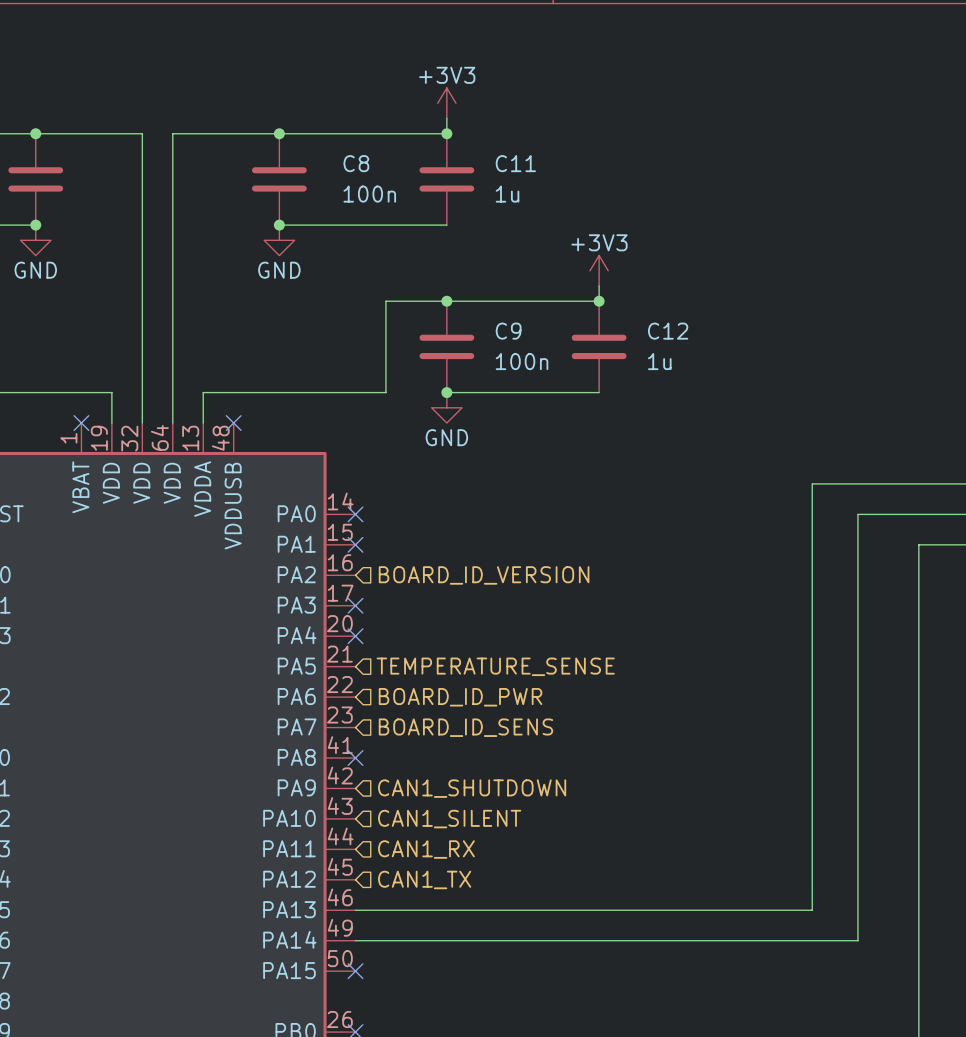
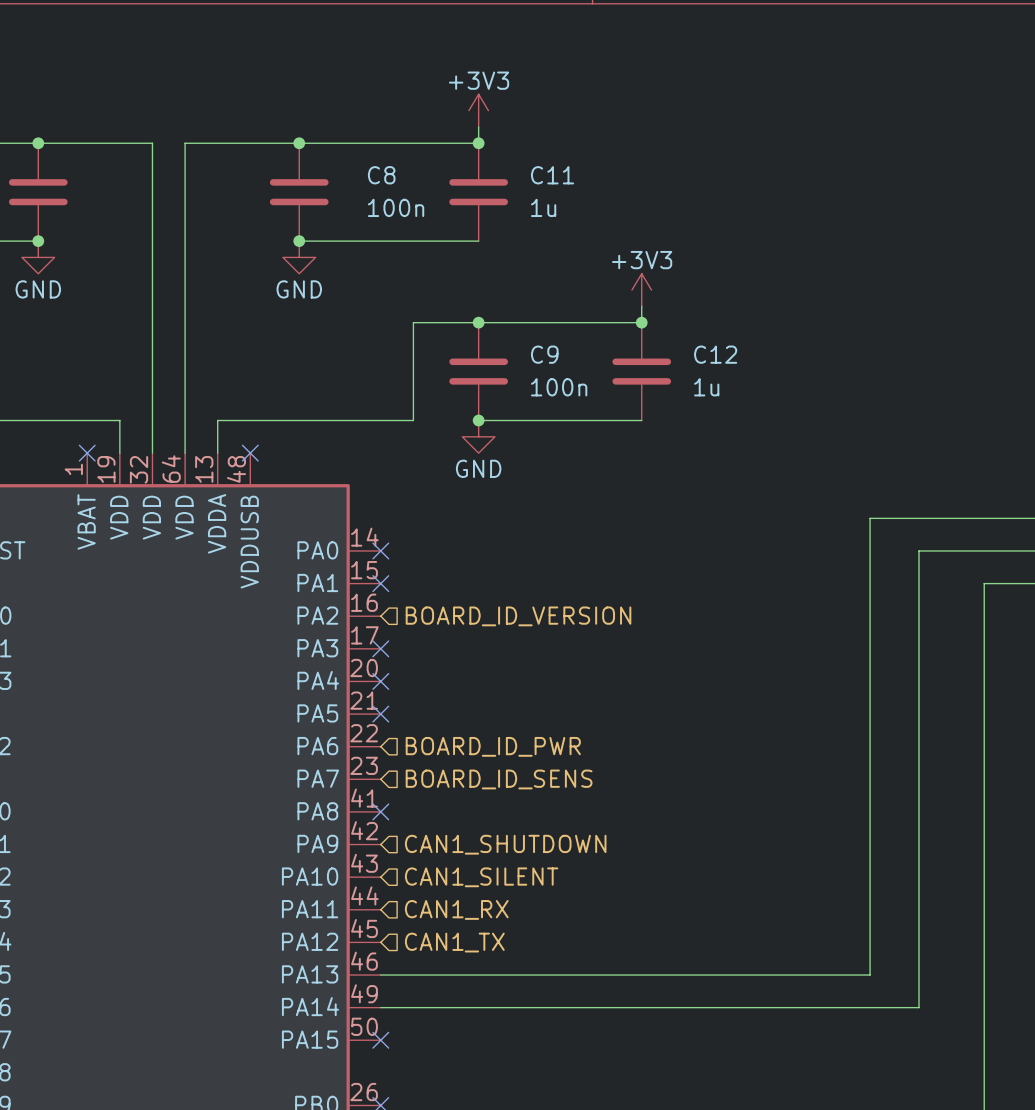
no-connect mark: none -> (380, 714)
hierarchical label: TEMPERATURE_SENSE (495, 666) -> none

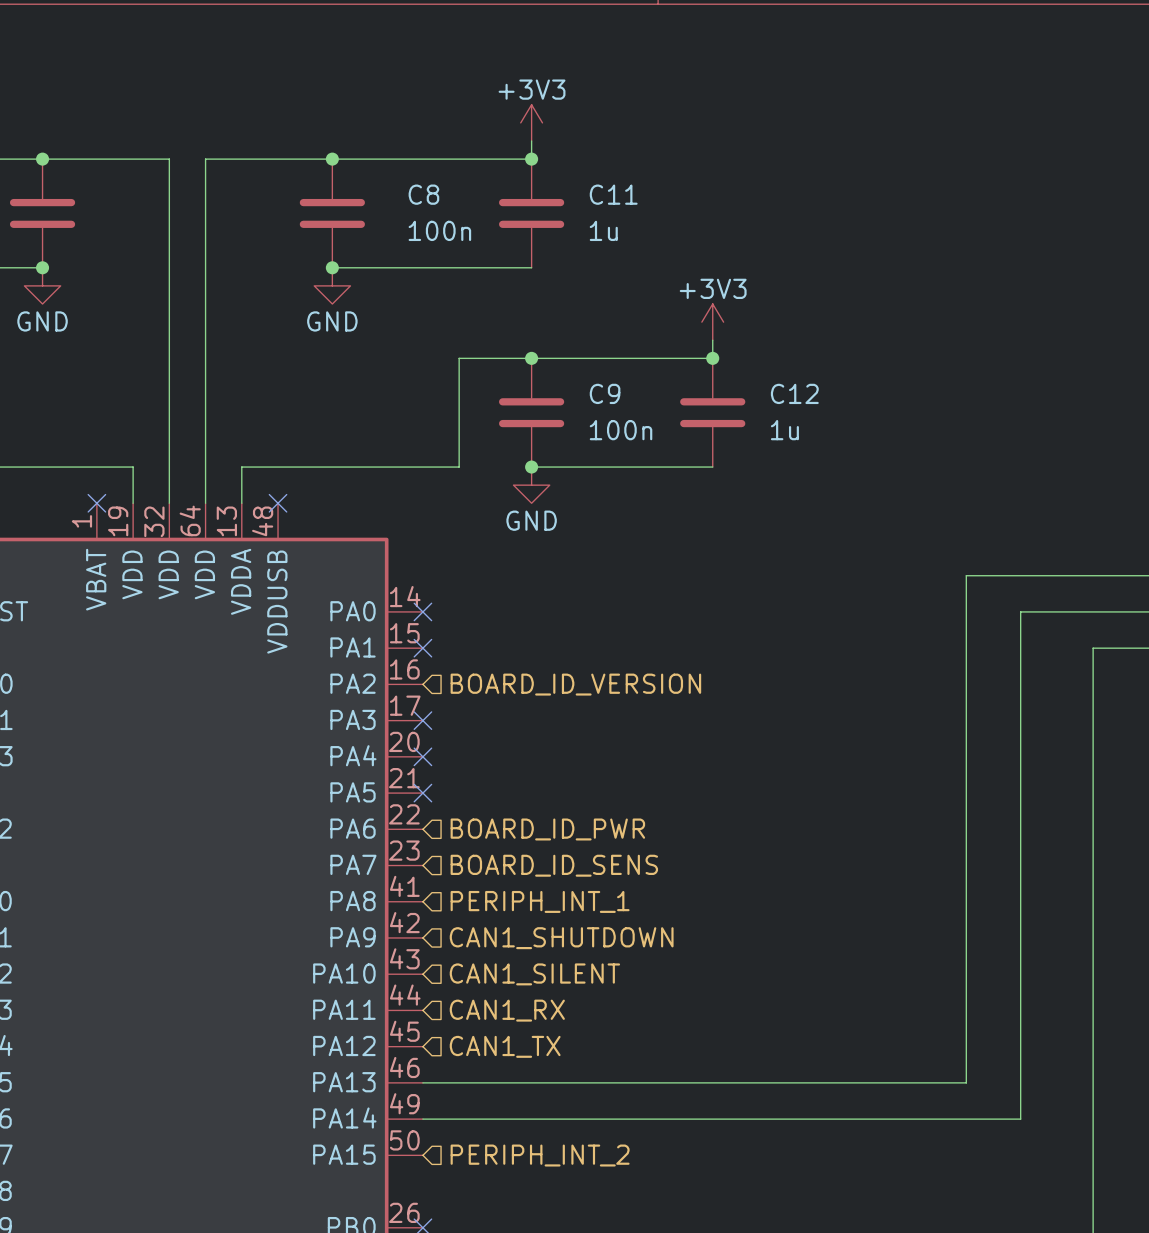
no-connect mark: (380, 811) -> none
hierarchical label: none -> PERIPH_INT_1 (540, 901)
no-connect mark: (380, 1040) -> none
hierarchical label: none -> PERIPH_INT_2 (540, 1155)

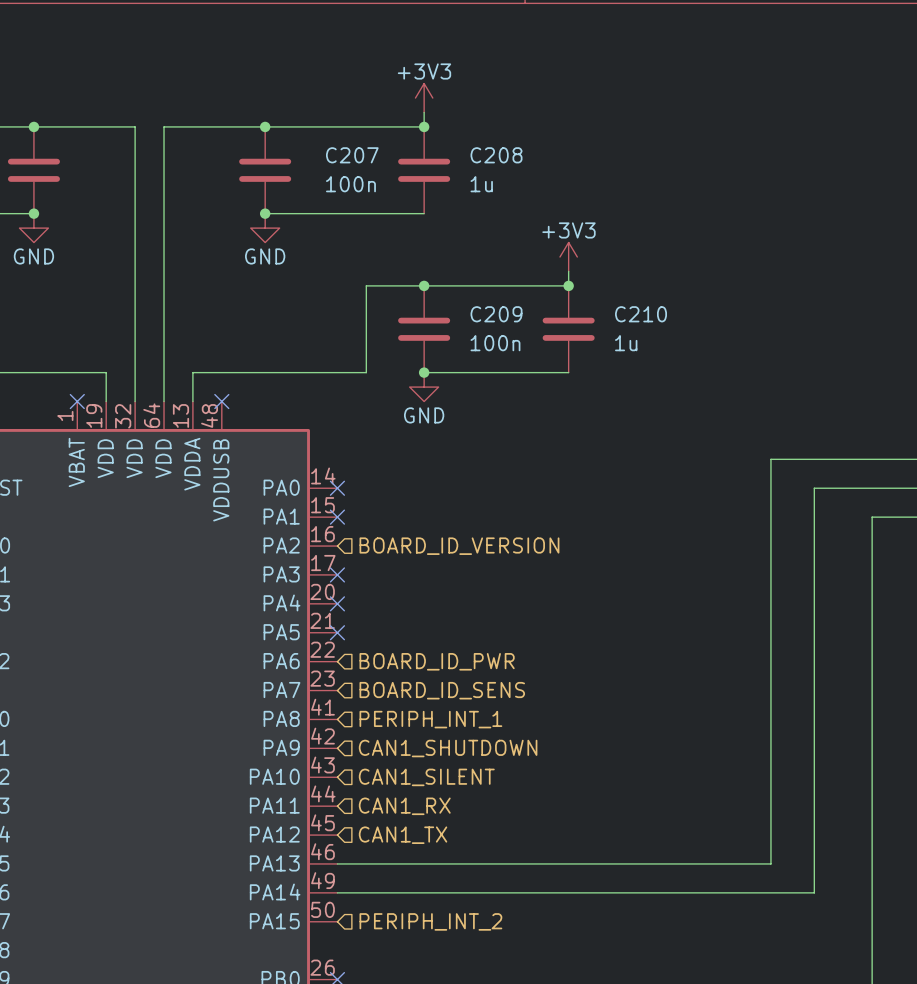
C8 name: C8 (423, 194) -> C207 (352, 155)
C11 name: C11 (613, 194) -> C208 (496, 155)
C9 name: C9 (605, 393) -> C209 (496, 314)
C12 name: C12 (794, 393) -> C210 (641, 314)

